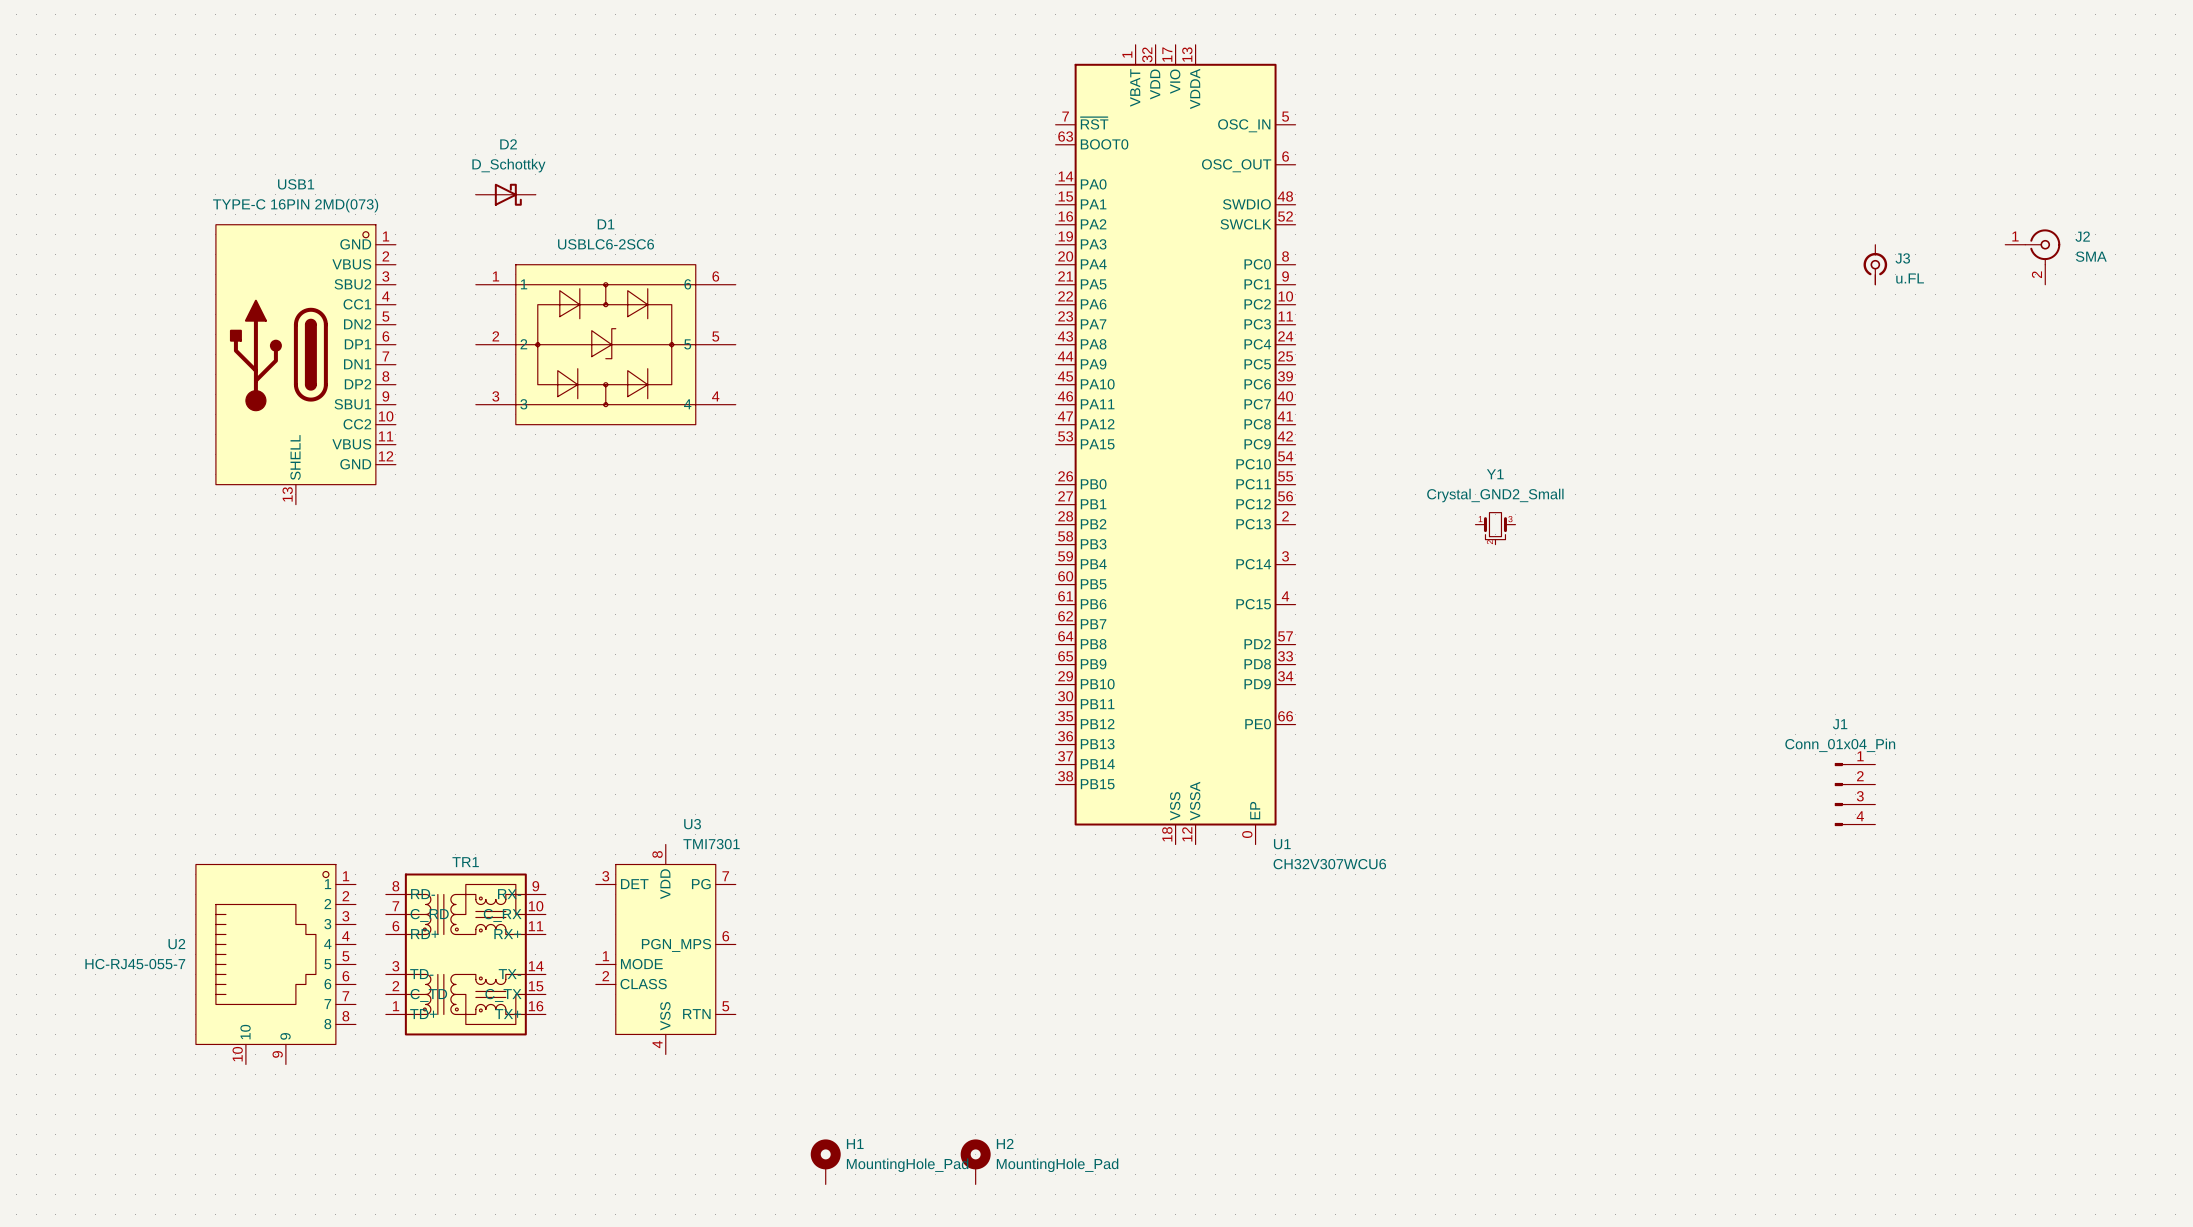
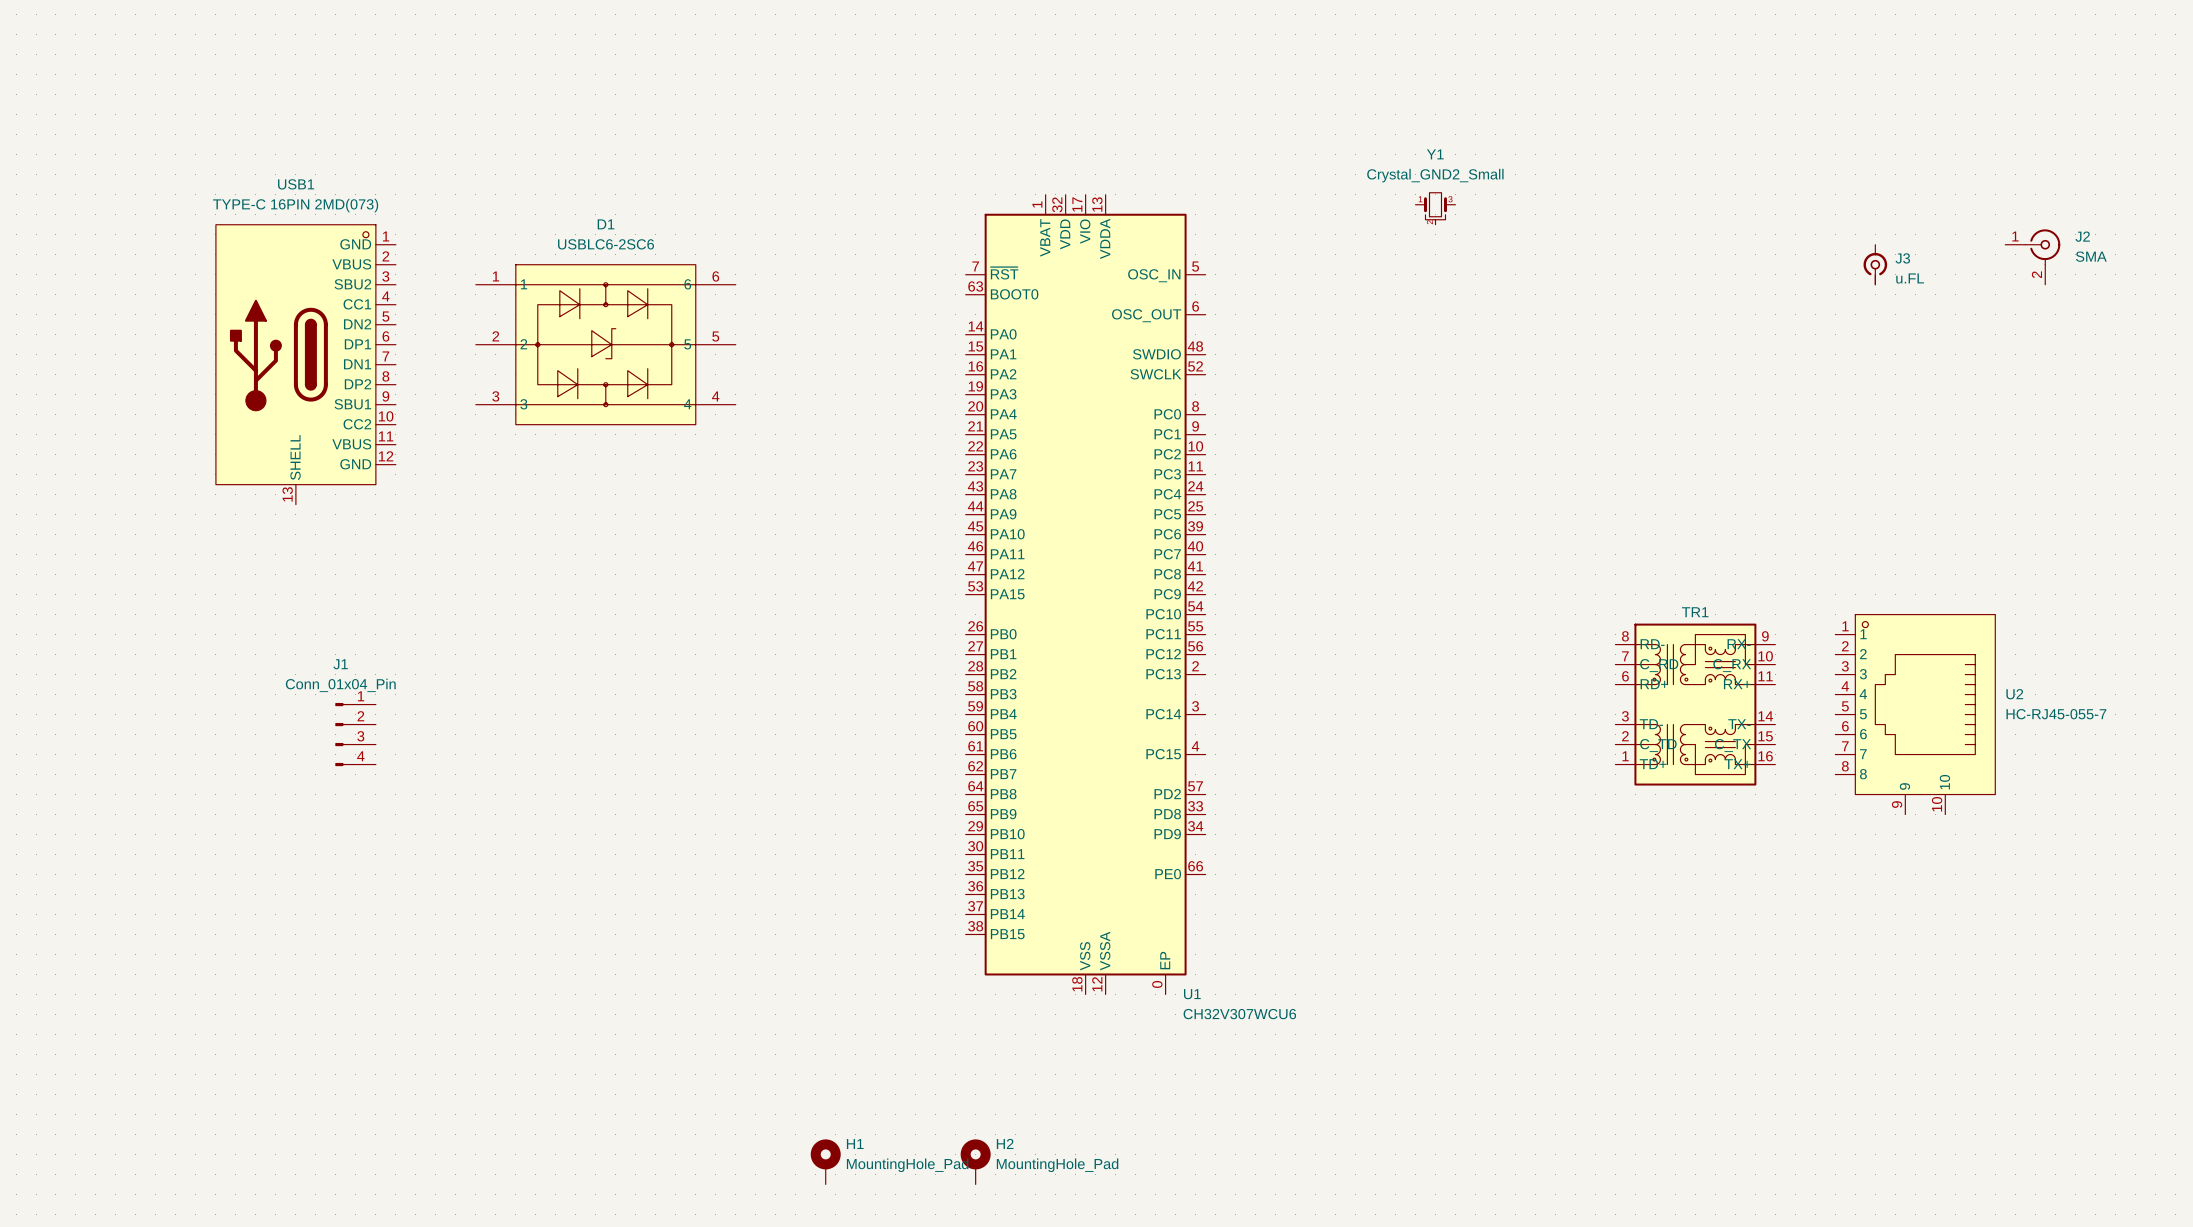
D2: D_Schottky (505, 194) -> none
U1 position: (1175, 444) -> (1085, 594)
Y1 position: (1495, 528) -> (1435, 208)
J1 position: (1855, 794) -> (355, 734)
U3: TMI7301 (665, 949) -> none
U2 flip: as is (265, 954) -> left-right (1925, 704)
TR1 position: (465, 954) -> (1695, 704)
U2 position: (275, 964) -> (1915, 714)

